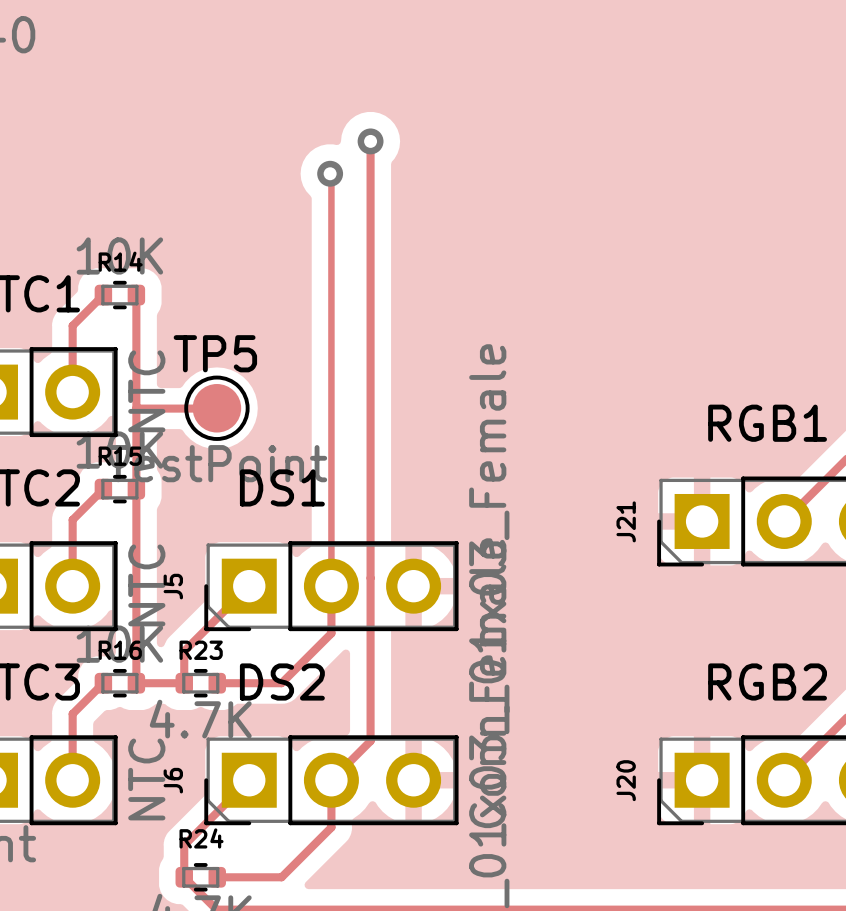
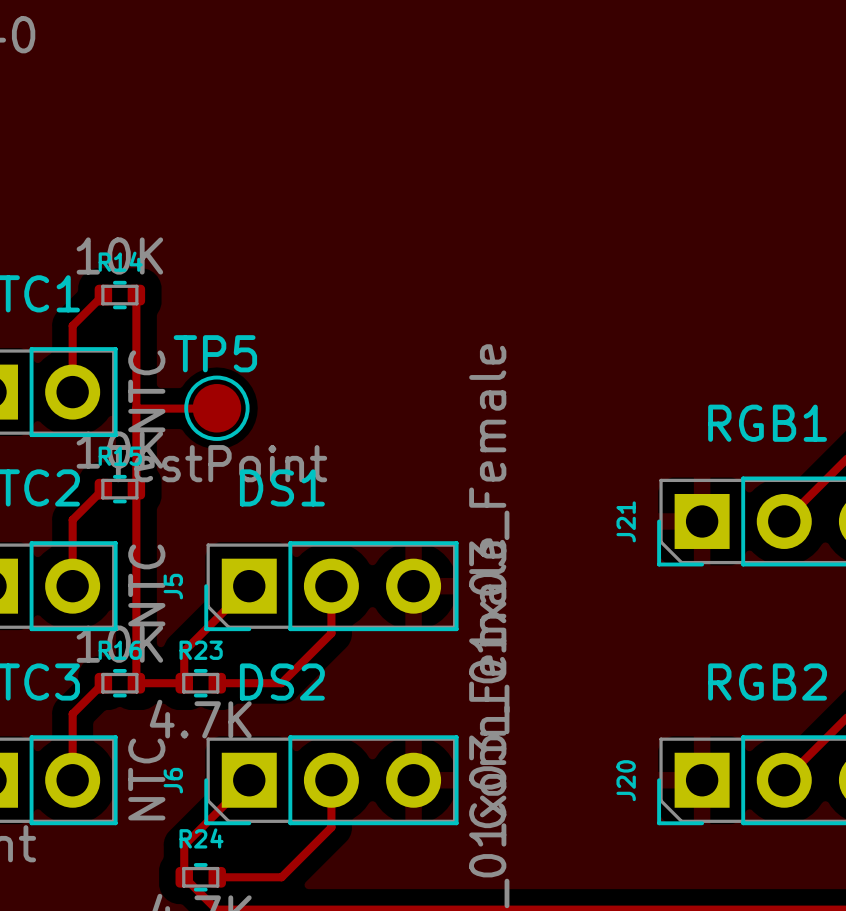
track: (370, 141) (370, 741) (331, 780) -> none
via: (370, 141) -> none
track: (330, 173) (331, 586) -> none
via: (330, 173) -> none

